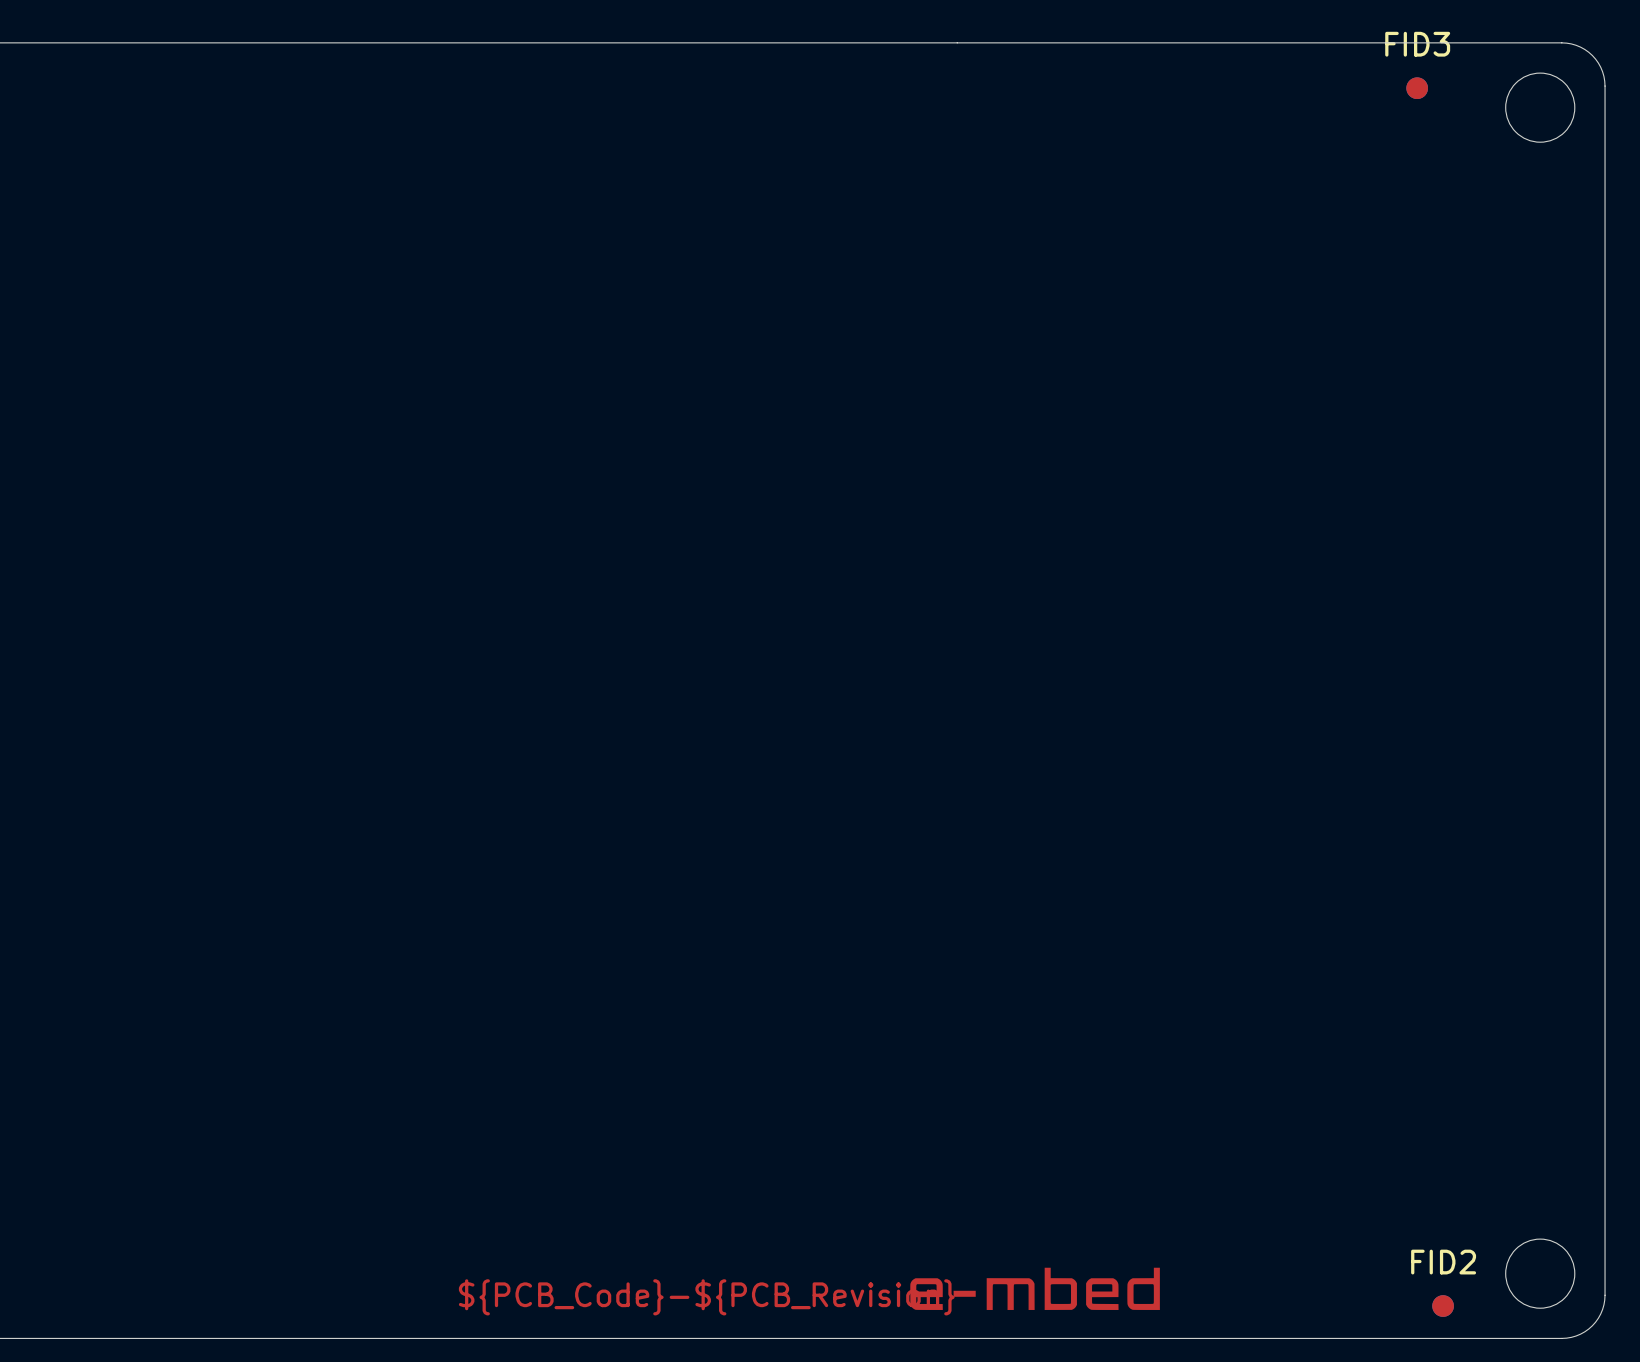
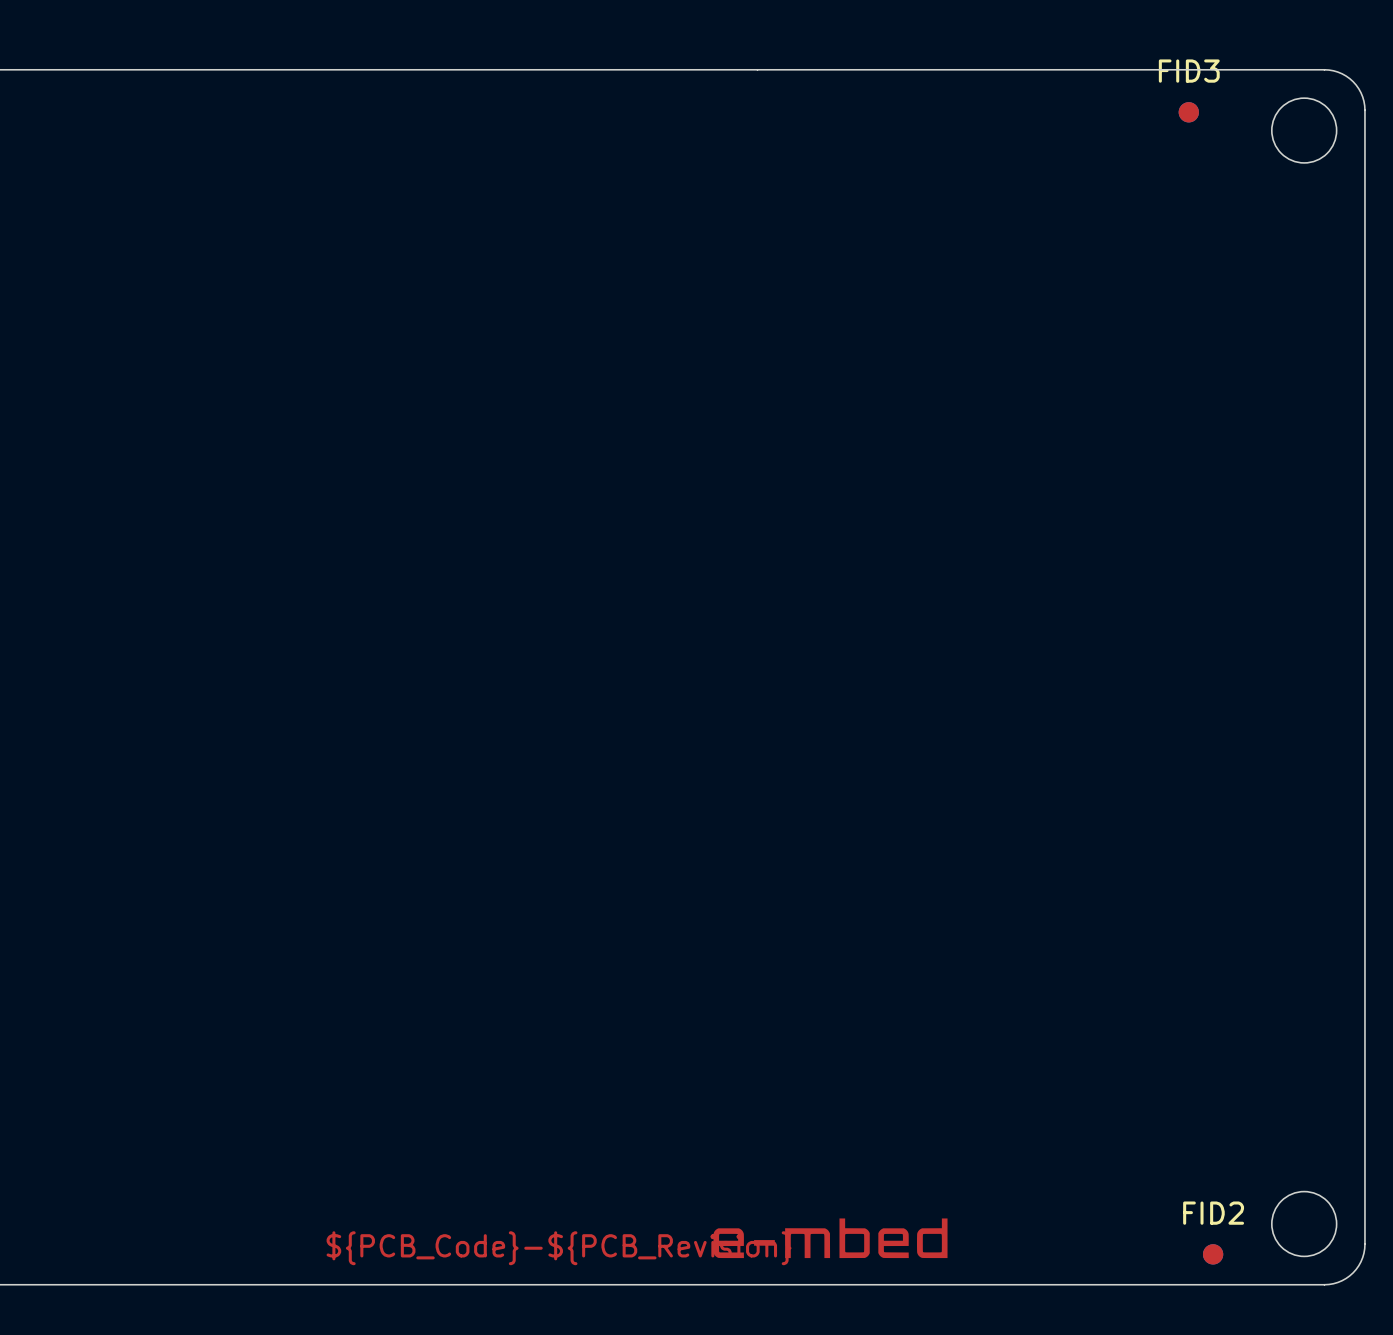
drawing position: (706, 1297) -> (559, 1248)

